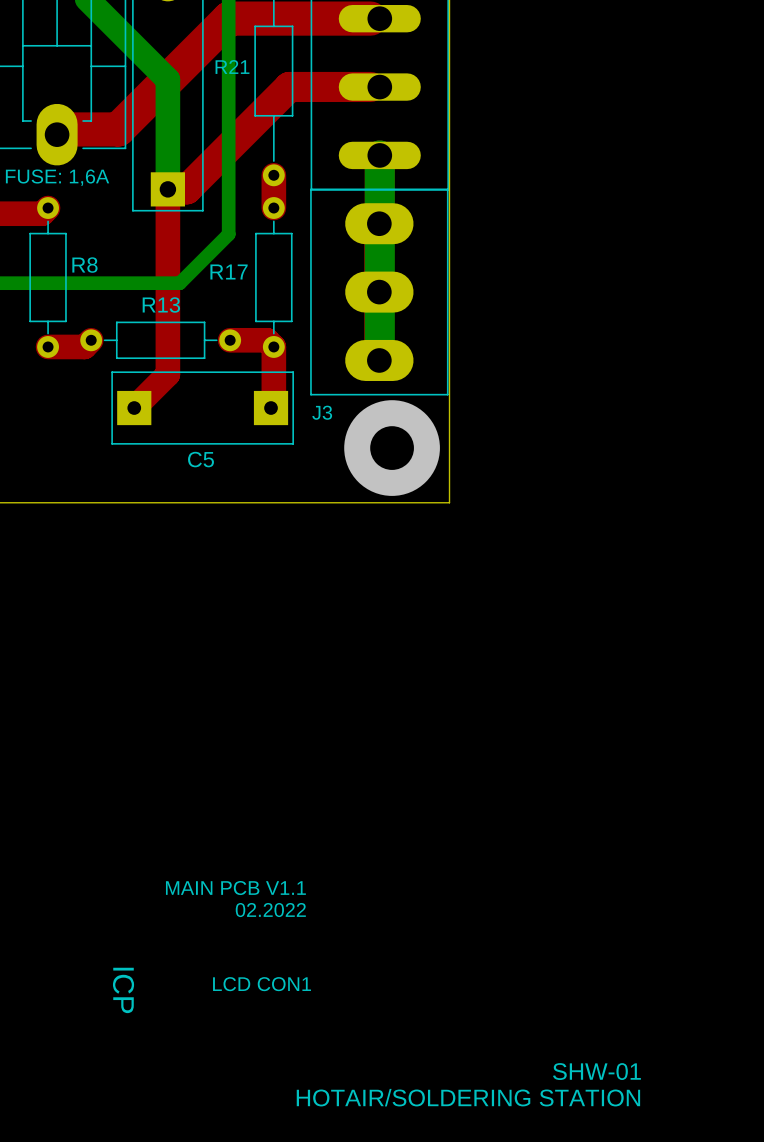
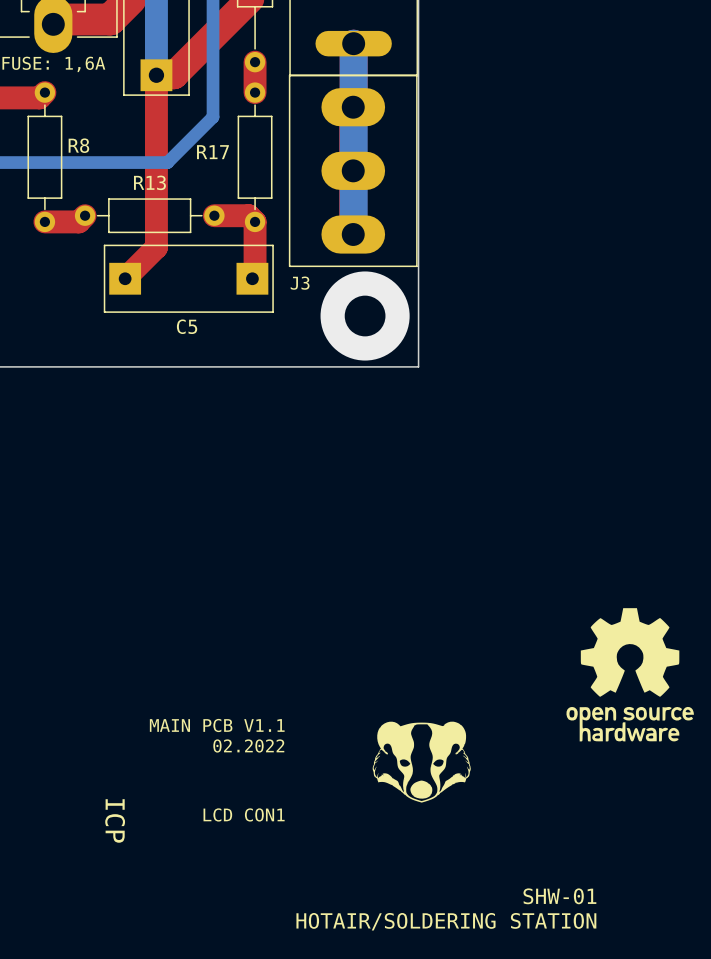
drawing: none -> [566, 608, 694, 742]
drawing: none -> [372, 721, 471, 803]

